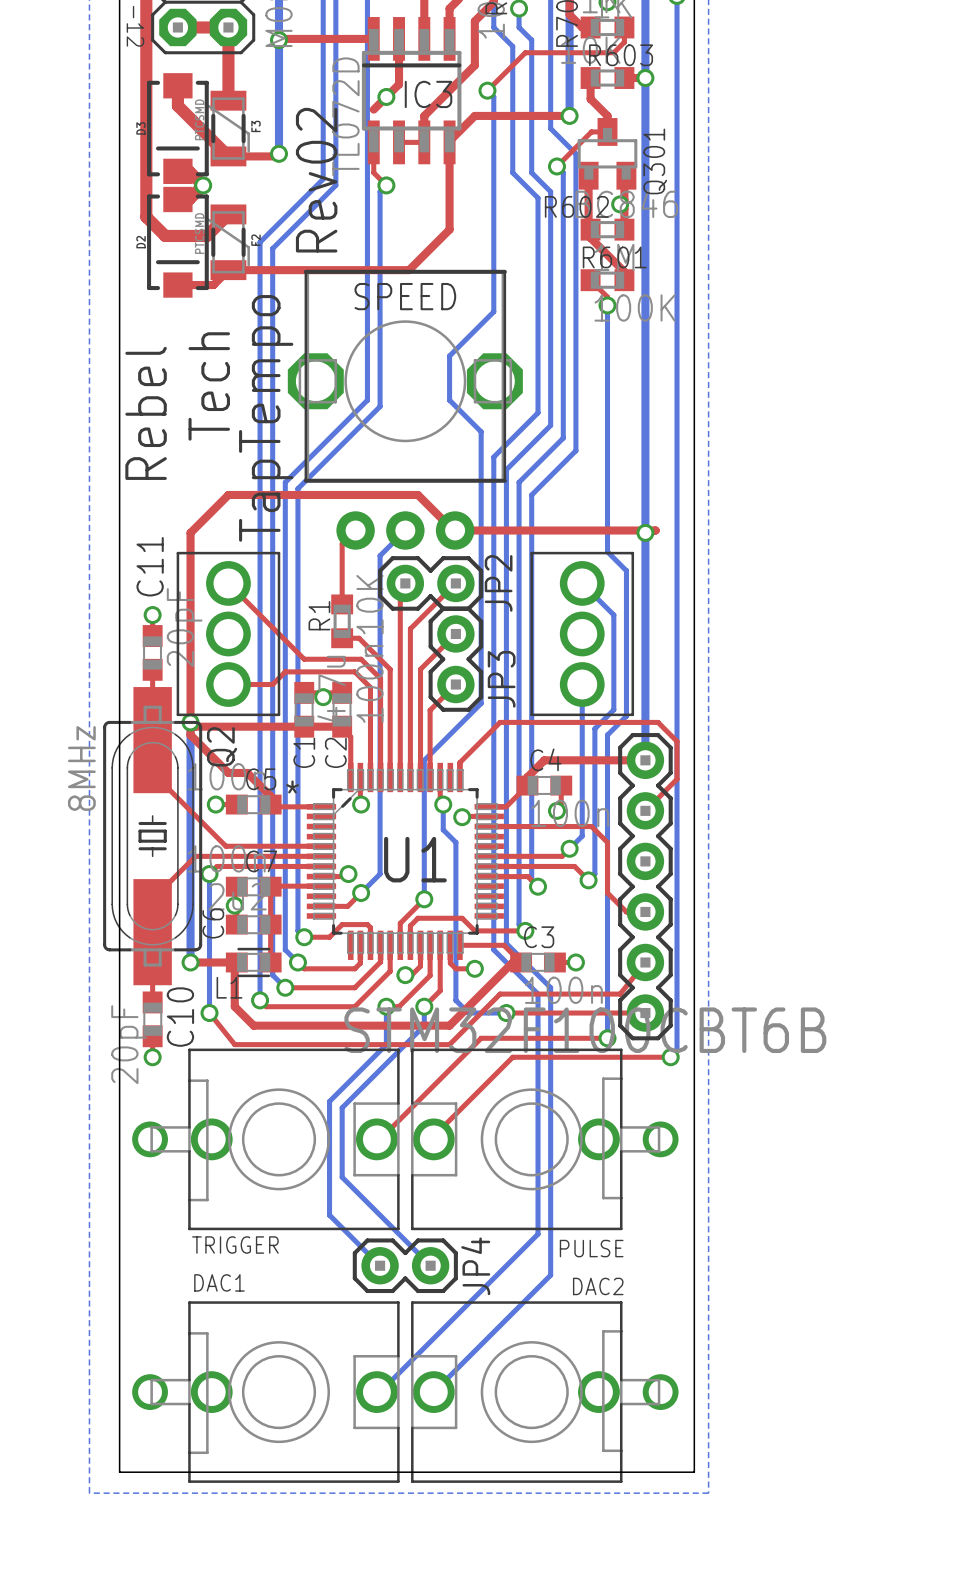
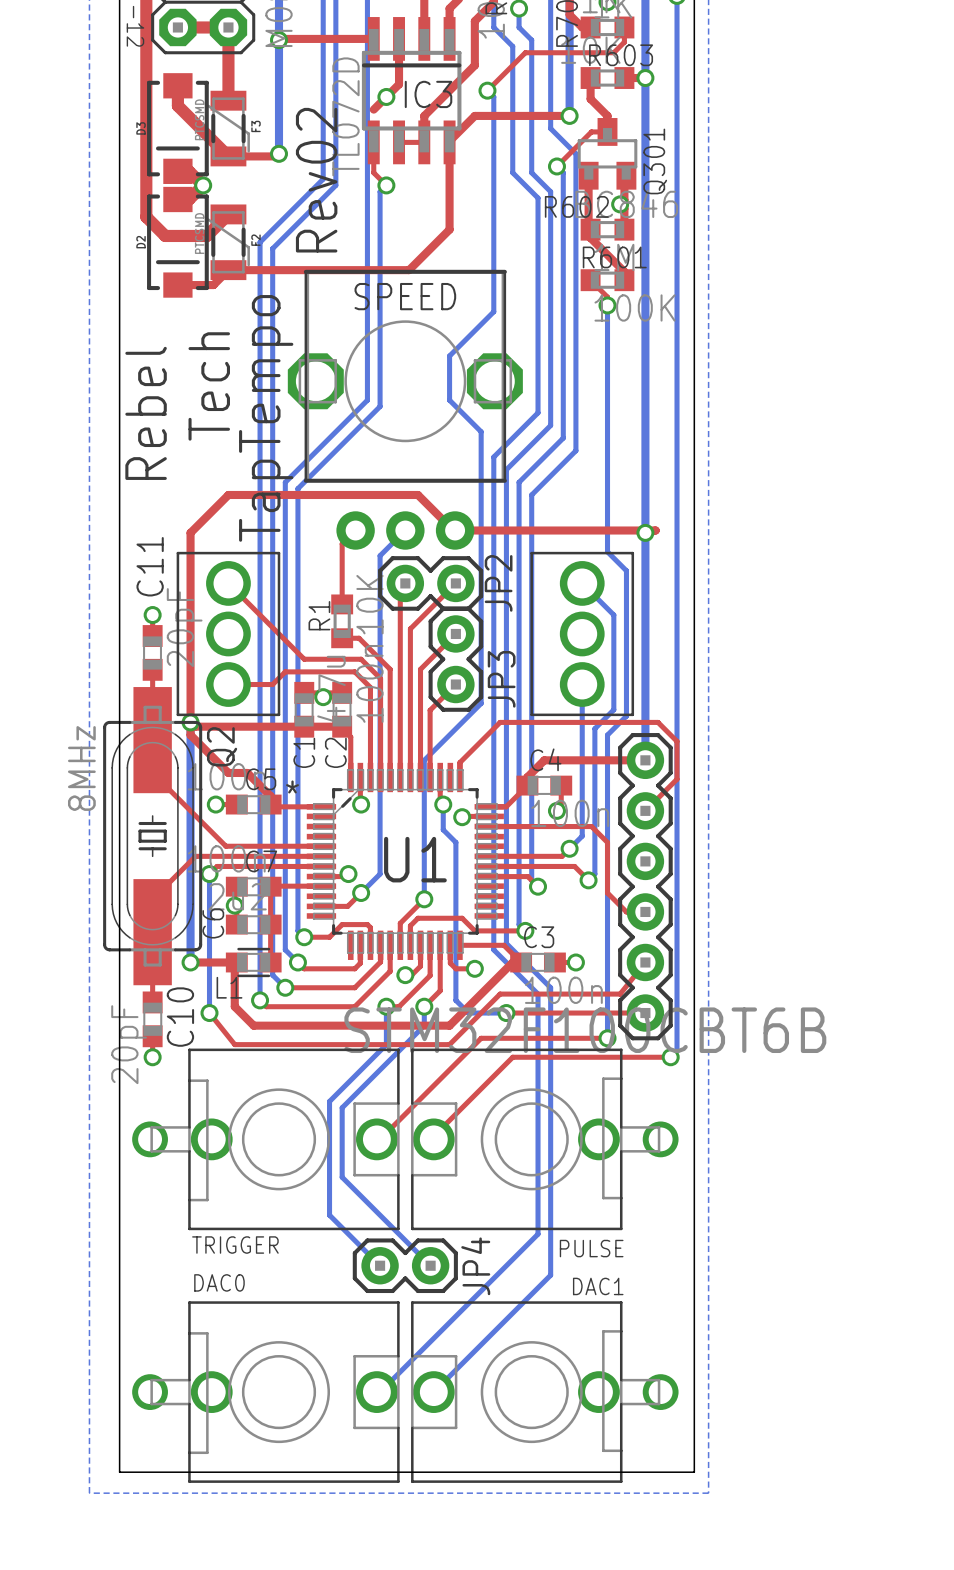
DAC1 name: DAC1 (219, 1282) -> DAC0 (219, 1282)
DAC2 name: DAC2 (598, 1286) -> DAC1 (598, 1286)

